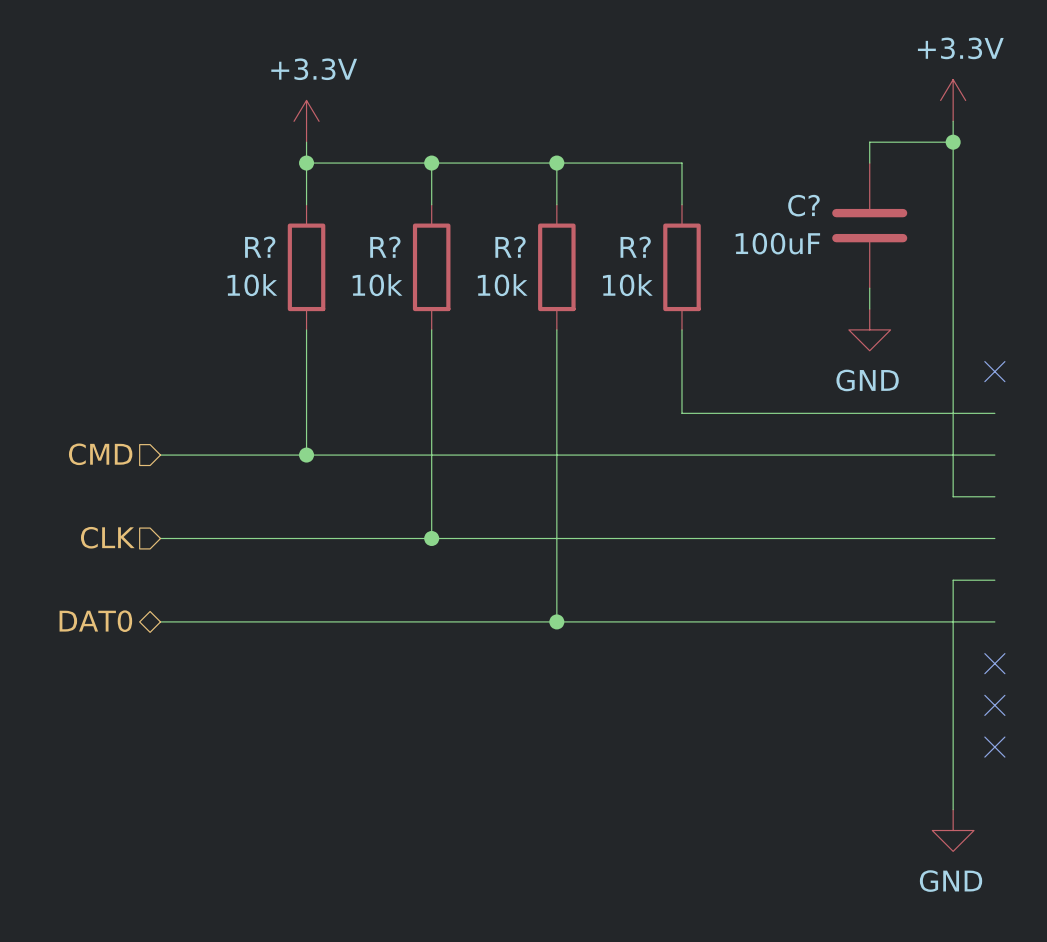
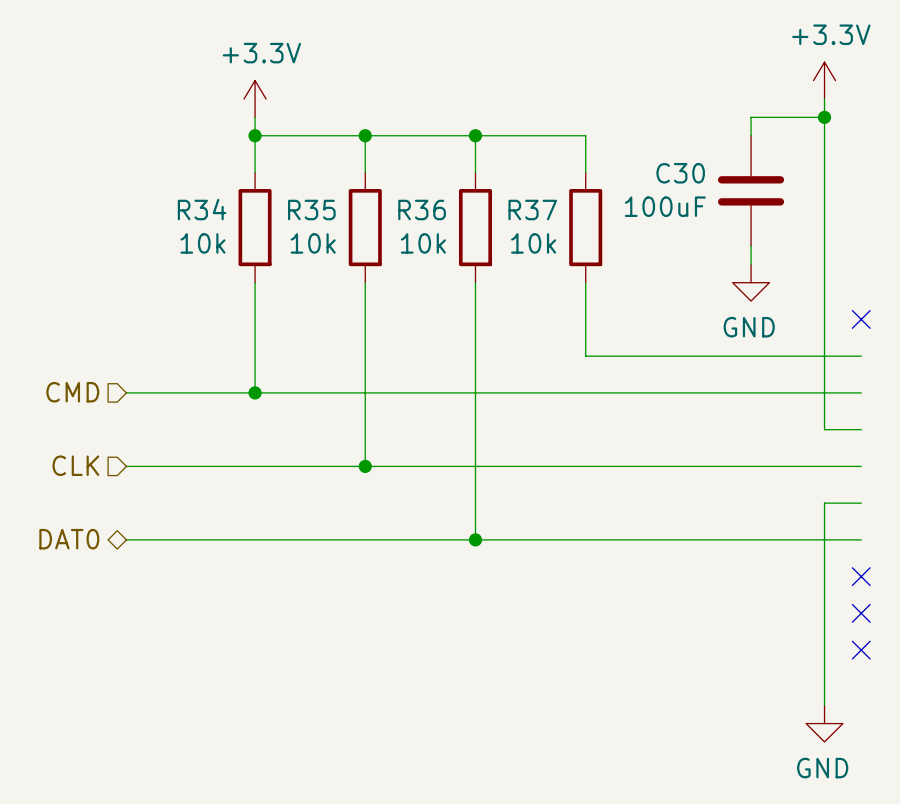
C? name: C? (803, 205) -> C30 (680, 173)
R? name: R? (260, 247) -> R34 (202, 209)
R? name: R? (385, 247) -> R35 (311, 210)
R? name: R? (510, 247) -> R36 (422, 210)
R? name: R? (635, 247) -> R37 (532, 210)

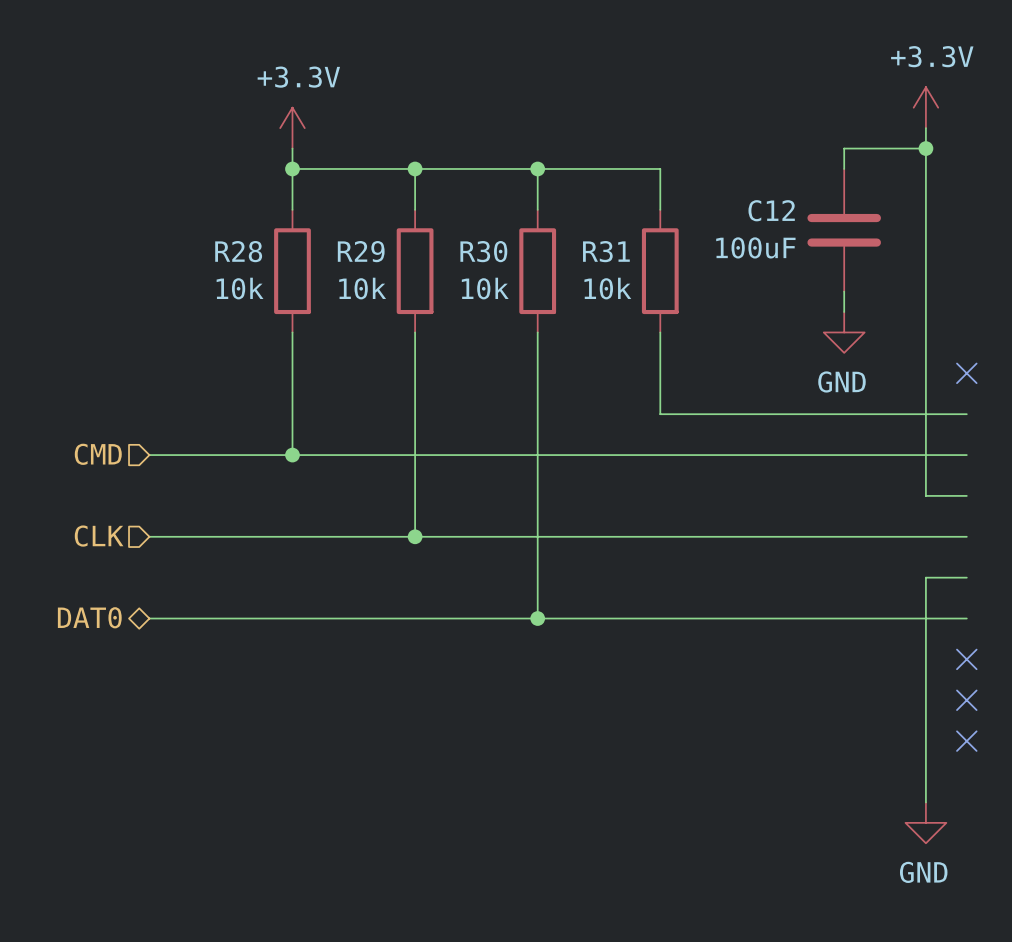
C30 name: C30 (680, 173) -> C12 (771, 210)
R34 name: R34 (202, 209) -> R28 (238, 251)
R35 name: R35 (311, 210) -> R29 (361, 251)
R36 name: R36 (422, 210) -> R30 (483, 251)
R37 name: R37 (532, 210) -> R31 (606, 251)

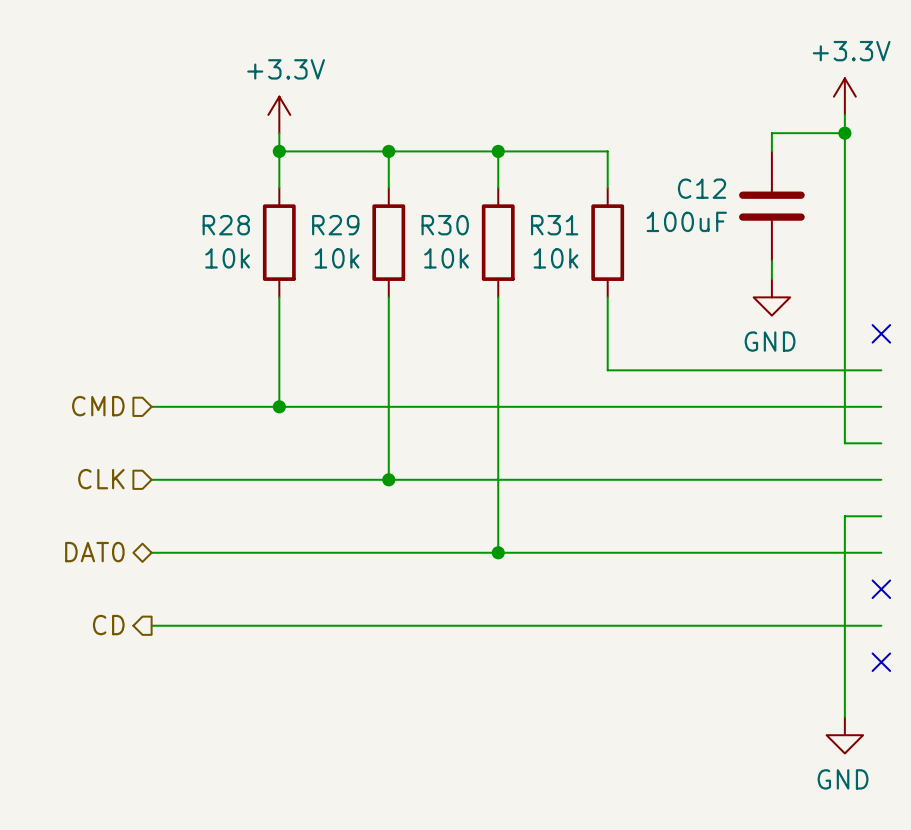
hierarchical label: none -> CD (108, 625)
wire: none -> (151, 625) (881, 625)
no-connect mark: (966, 700) -> none

